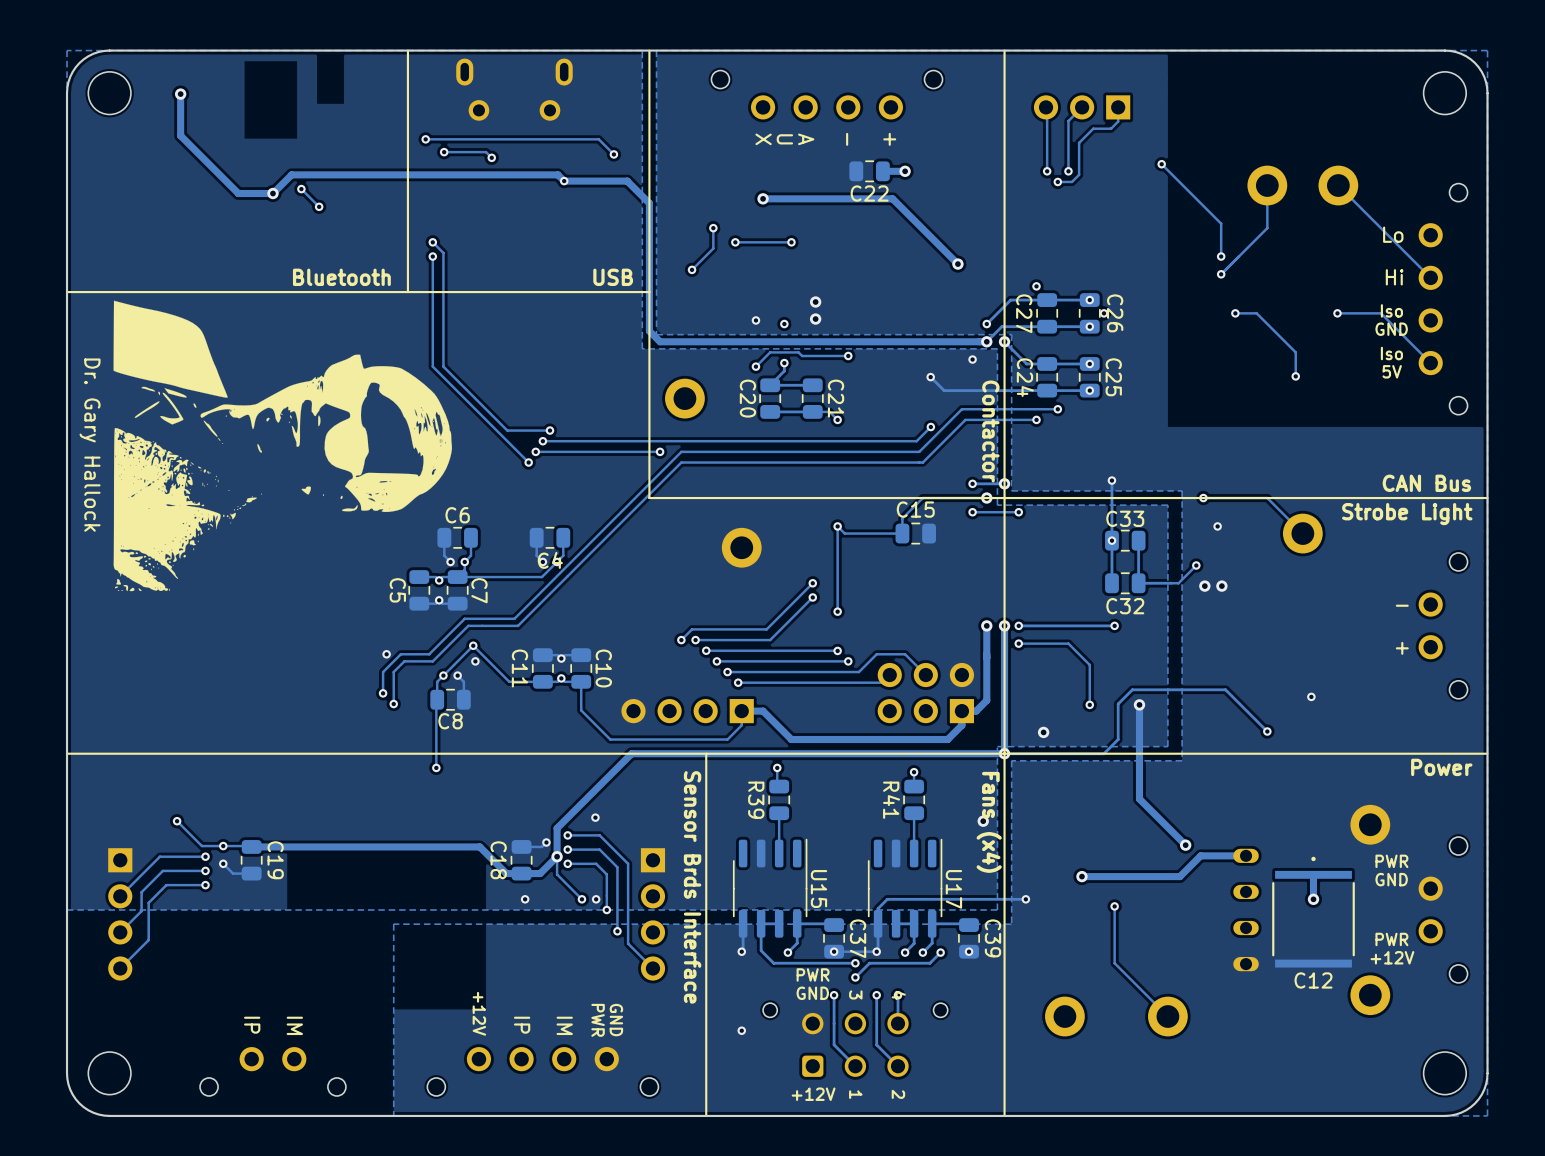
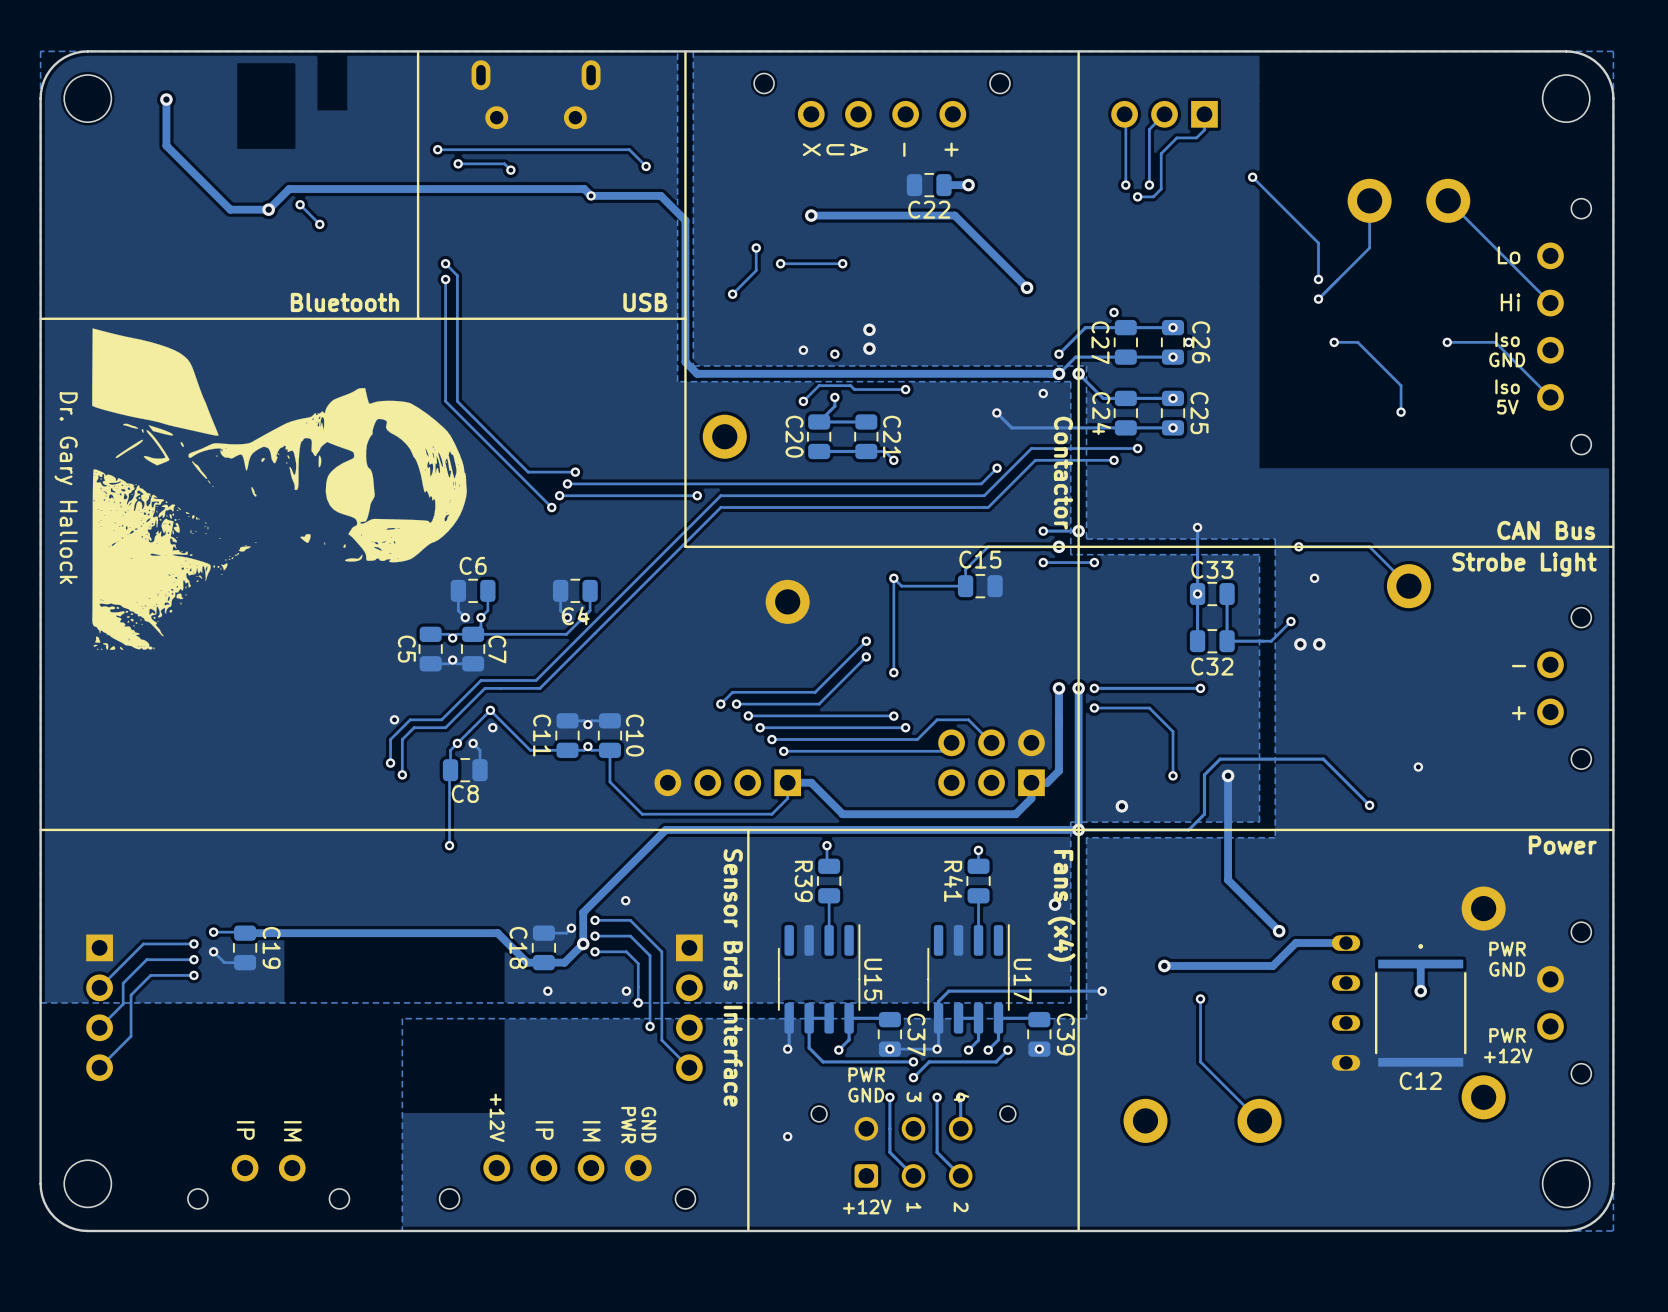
track: (177, 821) (201, 846) (223, 846) -> none
via: (177, 821) -> none
track: (557, 856) (557, 874) (581, 899) -> none
via: (581, 899) -> none

